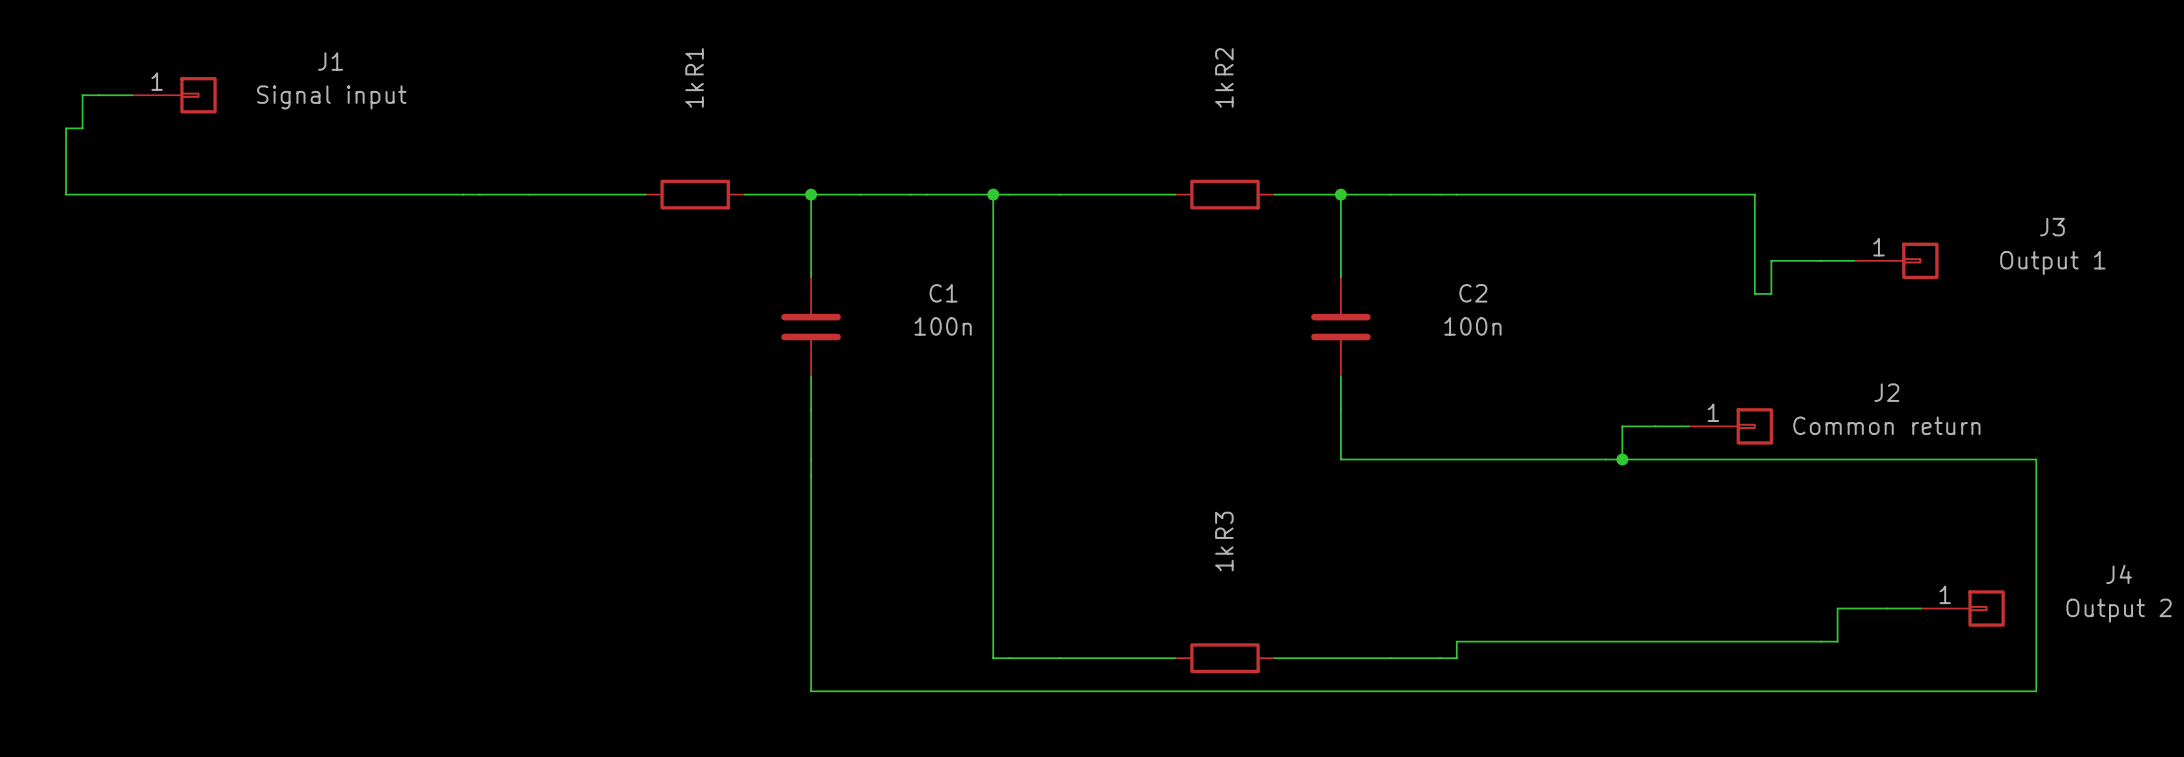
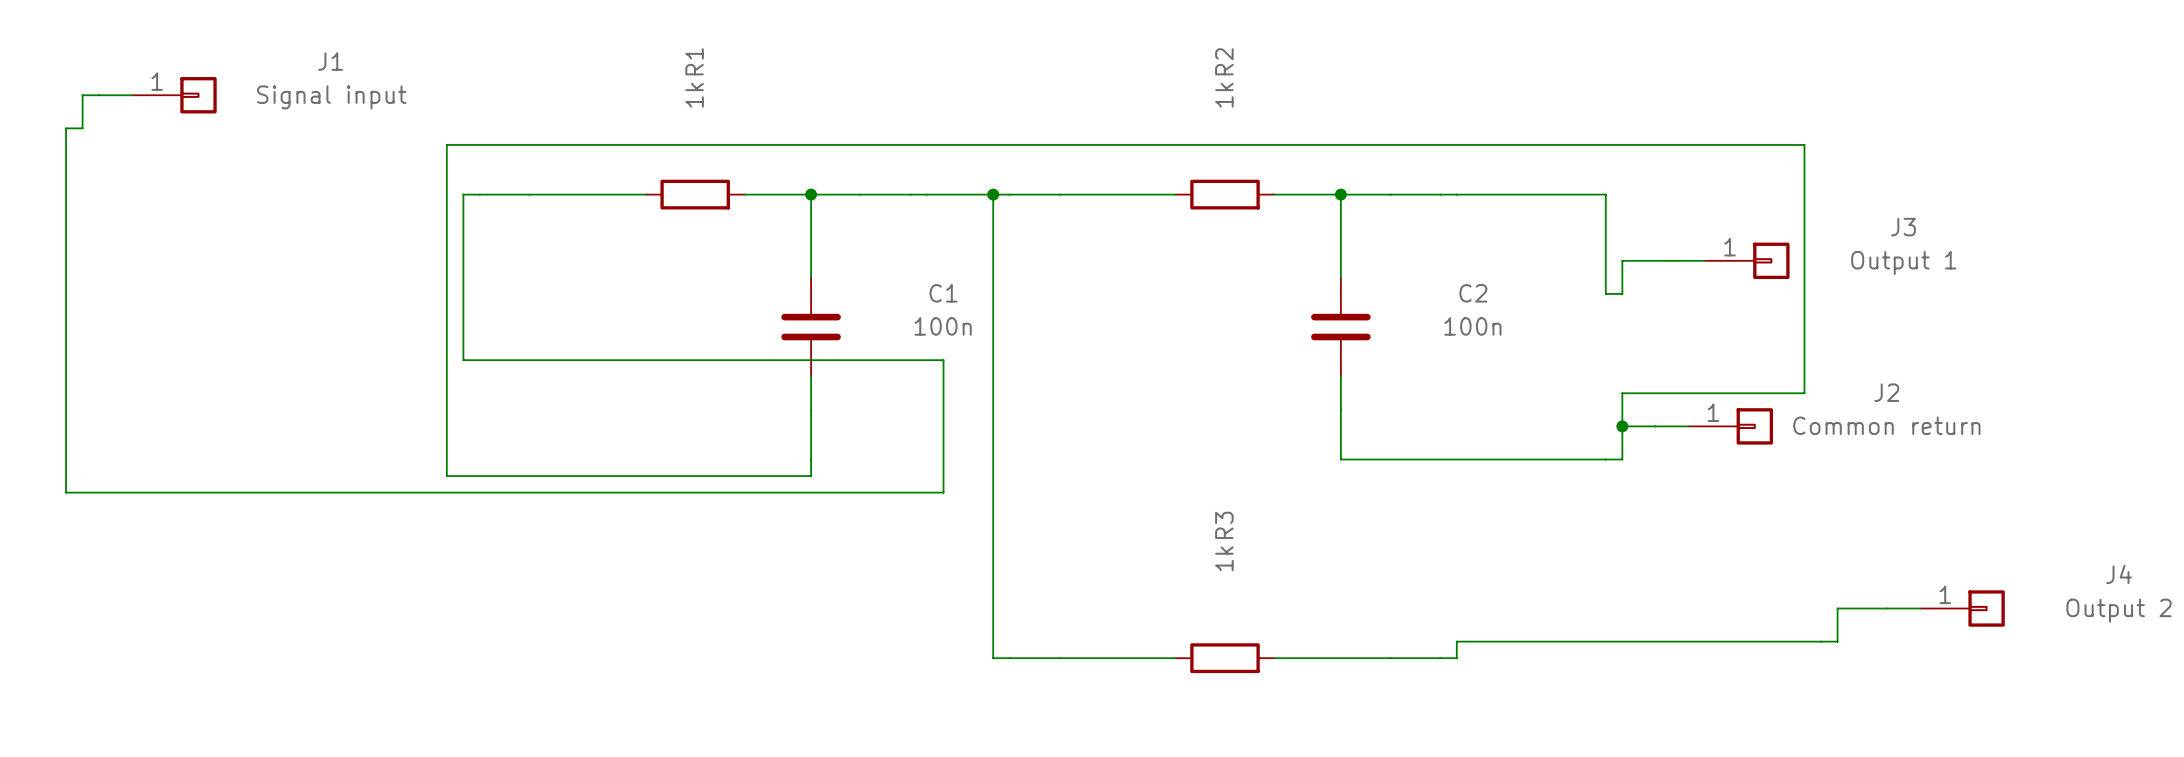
wire: (66, 194) (463, 194) -> (66, 194) (66, 492) (943, 492) (943, 360) (463, 360) (463, 194)
wire: (1605, 194) (1754, 194) (1754, 293) (1771, 293) (1771, 260) (1854, 260) -> (1605, 194) (1605, 293) (1622, 293) (1622, 260) (1705, 260)
J3 position: (1896, 260) -> (1747, 260)
wire: (1622, 459) (2036, 459) (2036, 691) (811, 691) (811, 476) -> (1622, 426) (1622, 393) (1804, 393) (1804, 144) (446, 144) (446, 476) (811, 476)
junction position: (1622, 459) -> (1622, 426)

